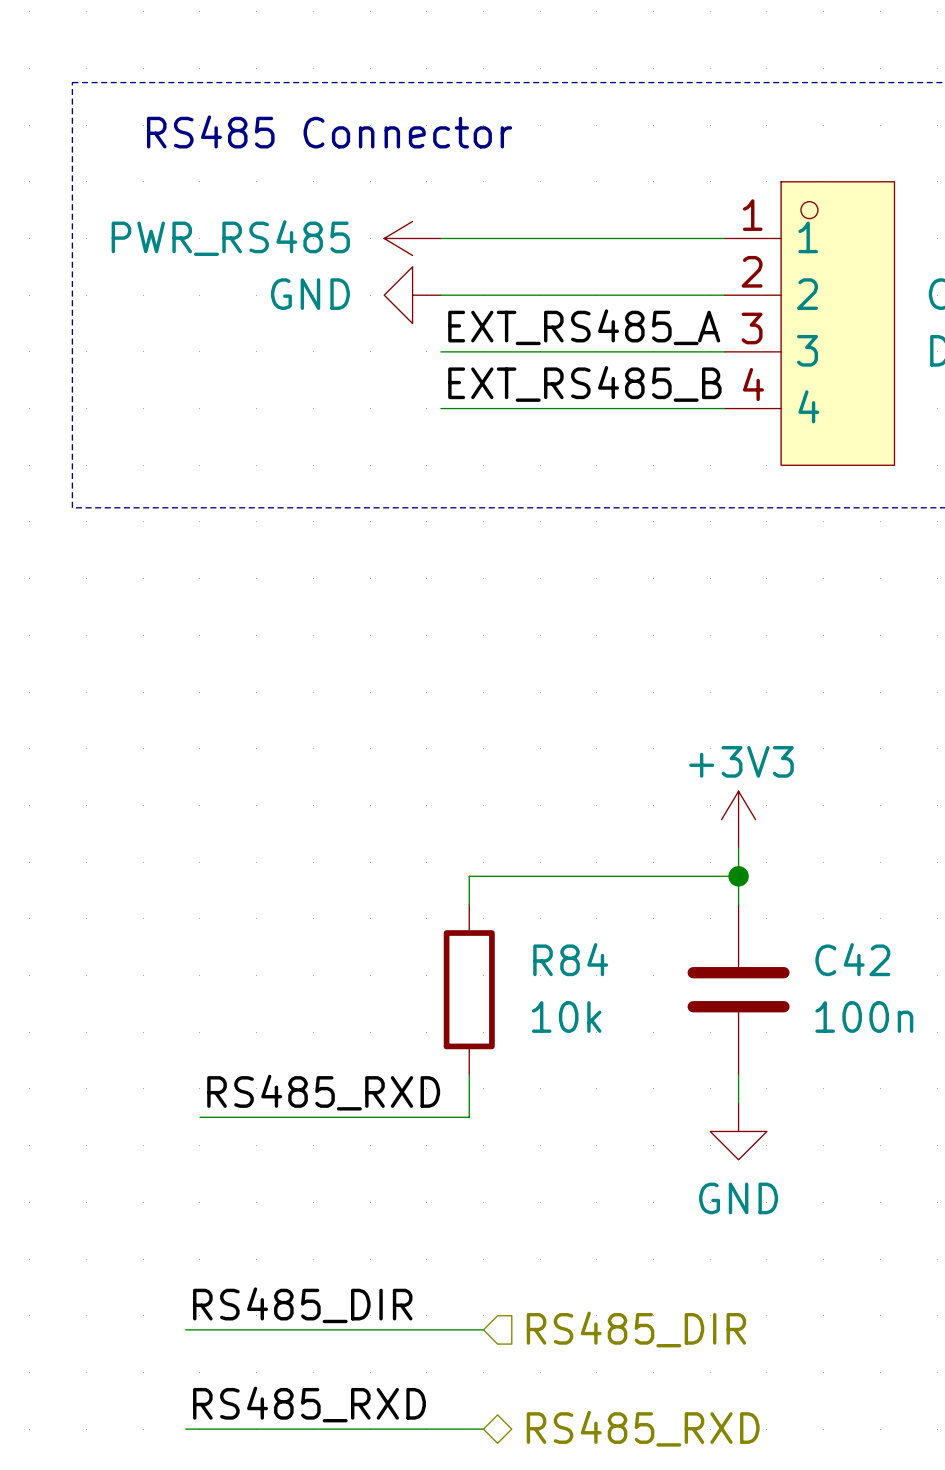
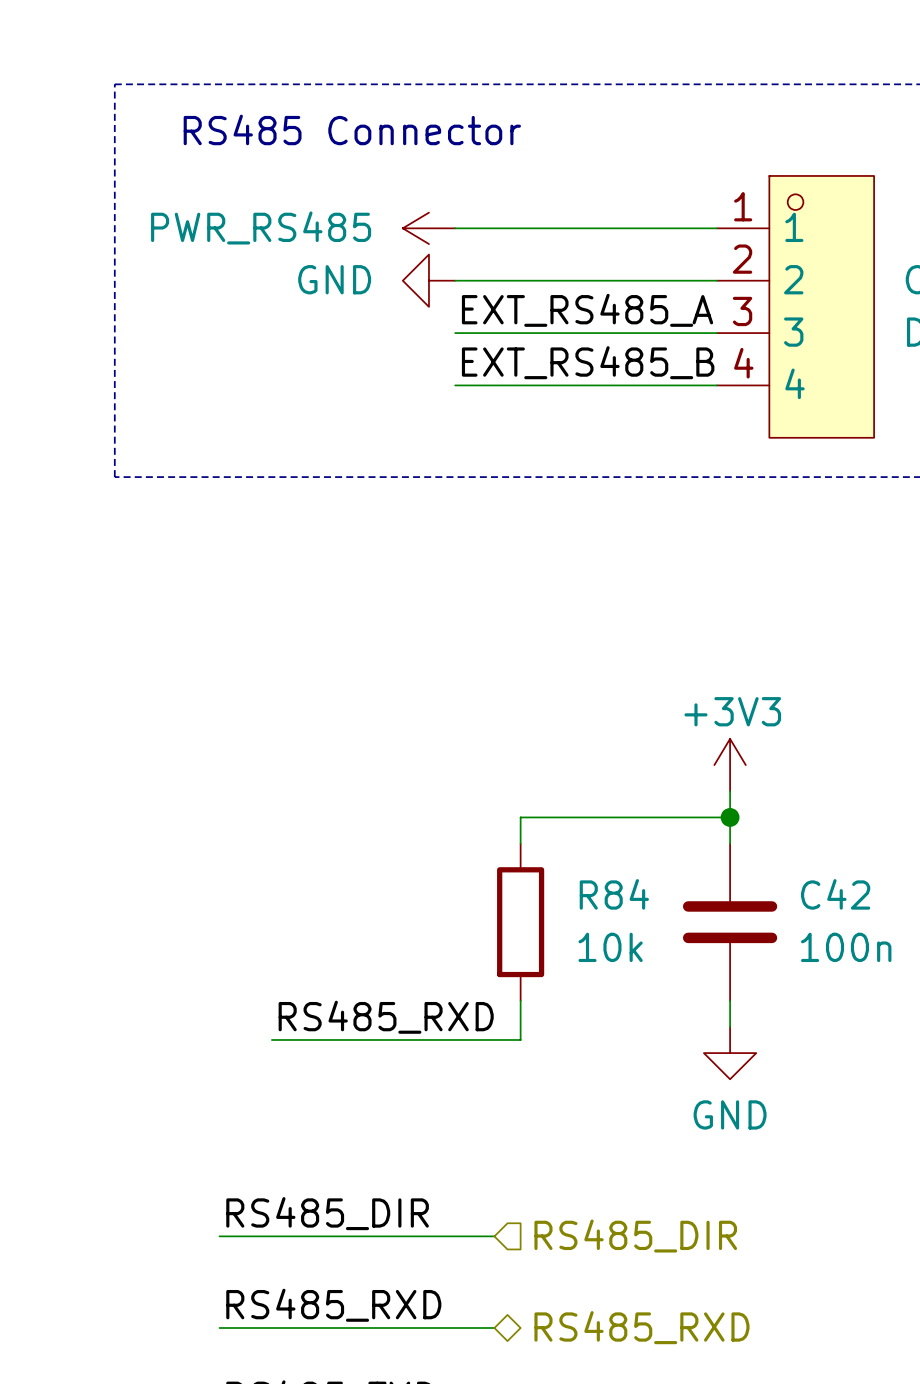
wire: (511, 876) (469, 876) (469, 904) -> (520, 817) (520, 843)
R84 position: (469, 989) -> (520, 922)
wire: (469, 1074) (469, 1117) -> (520, 1000) (520, 1039) (481, 1039)
label position: RS485_RXD (323, 1092) -> RS485_RXD (386, 1017)
wire: (199, 1117) (242, 1117) -> none

